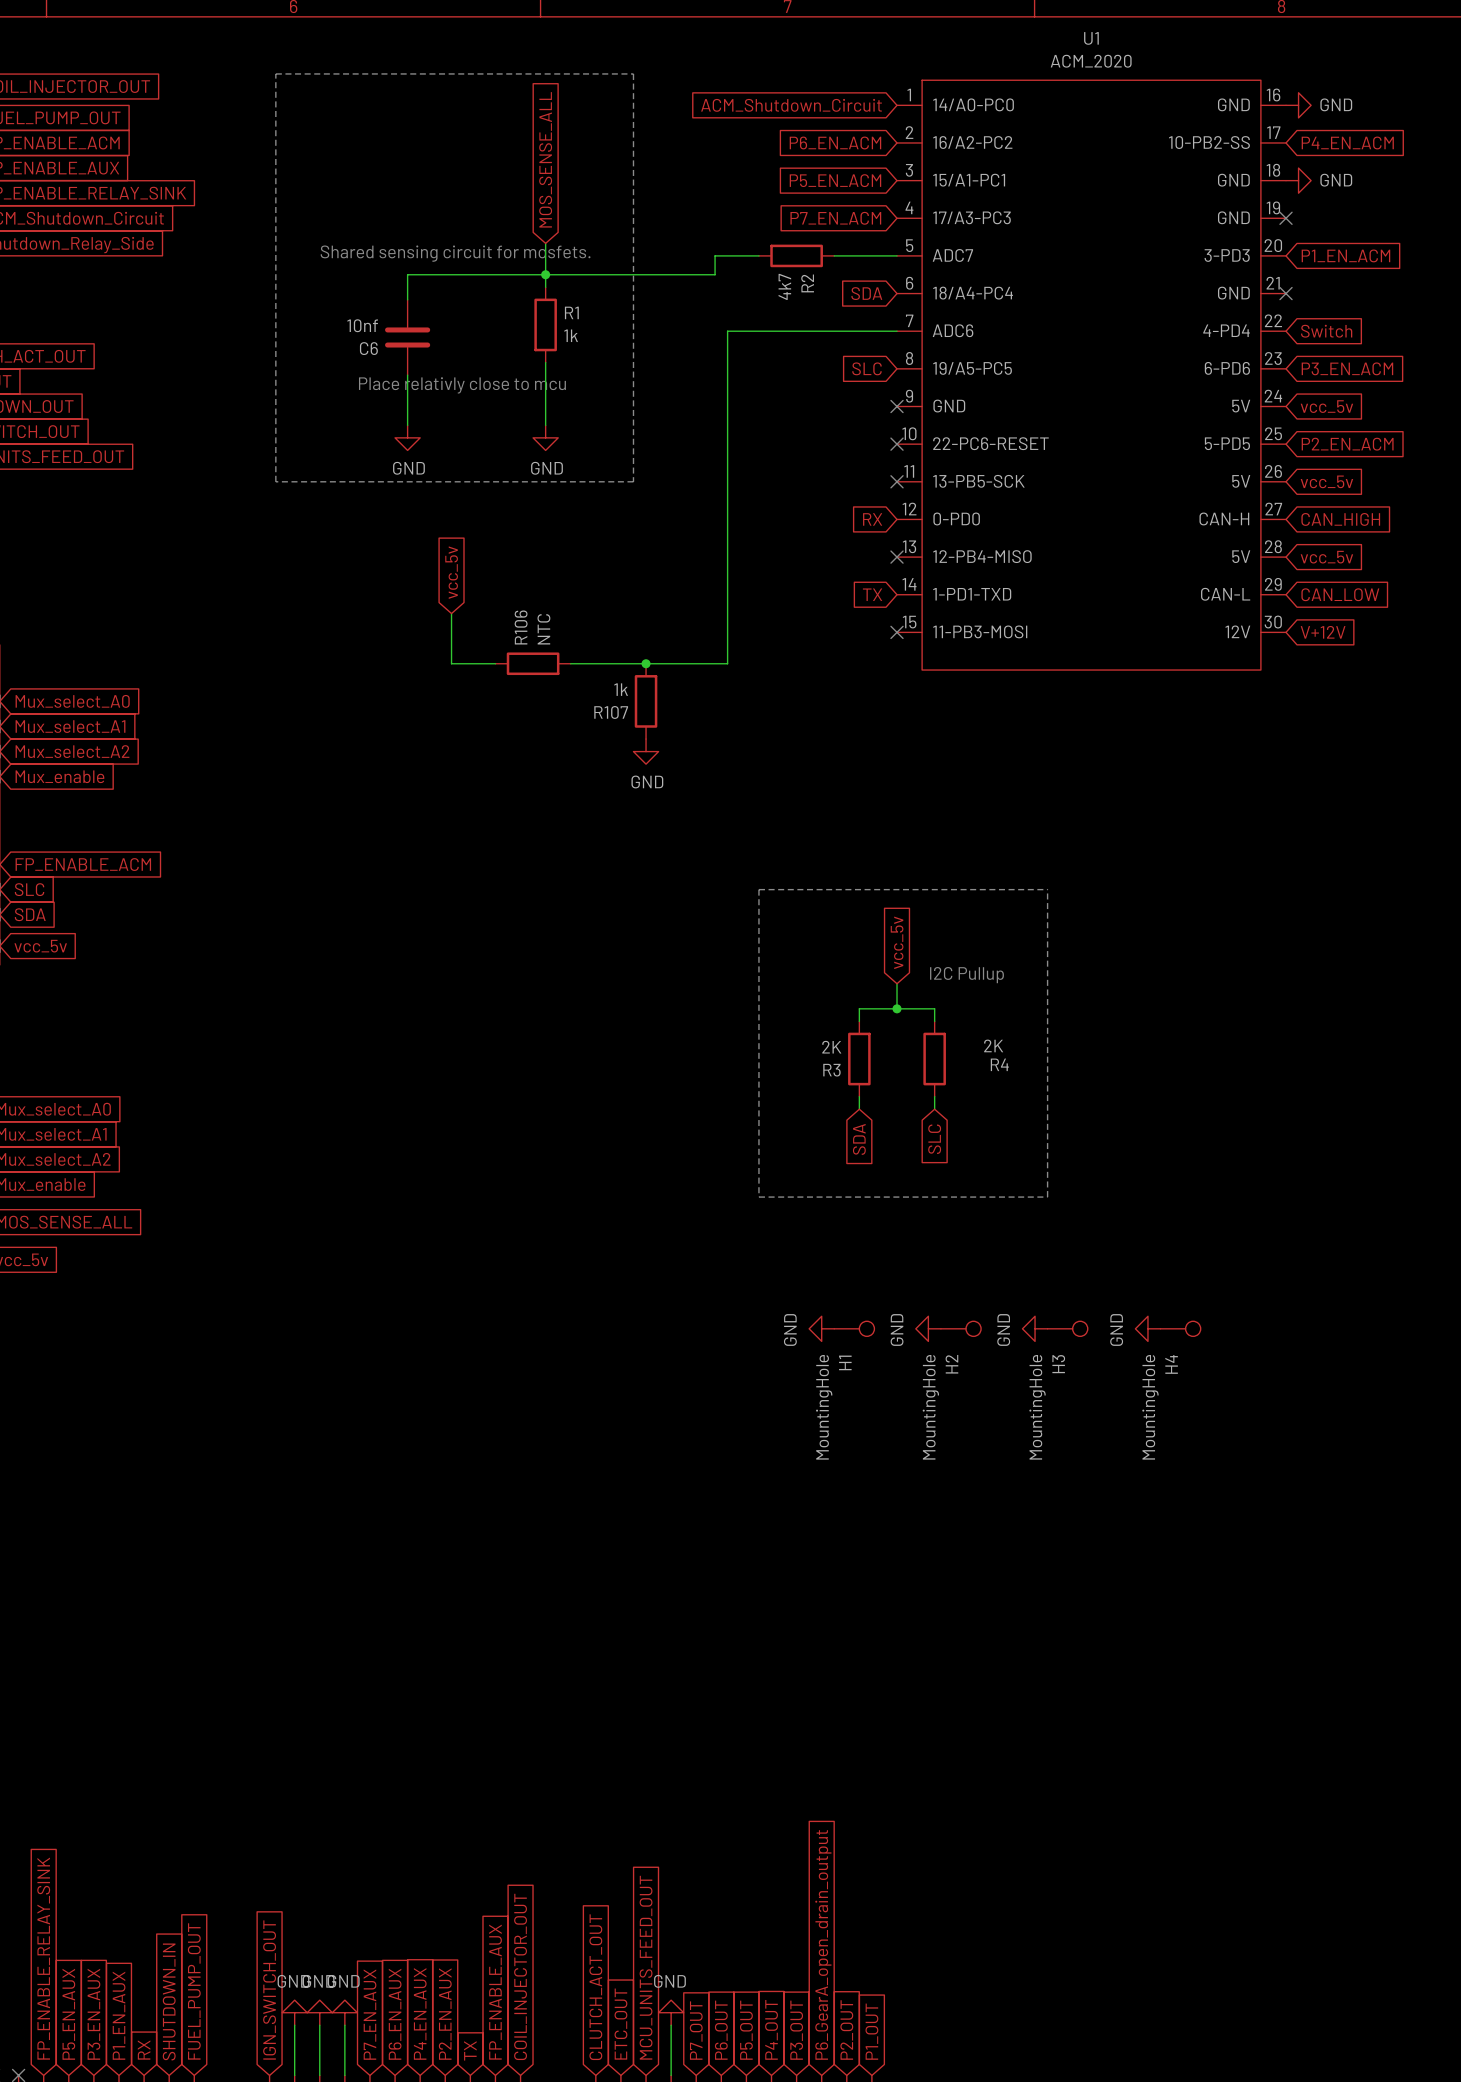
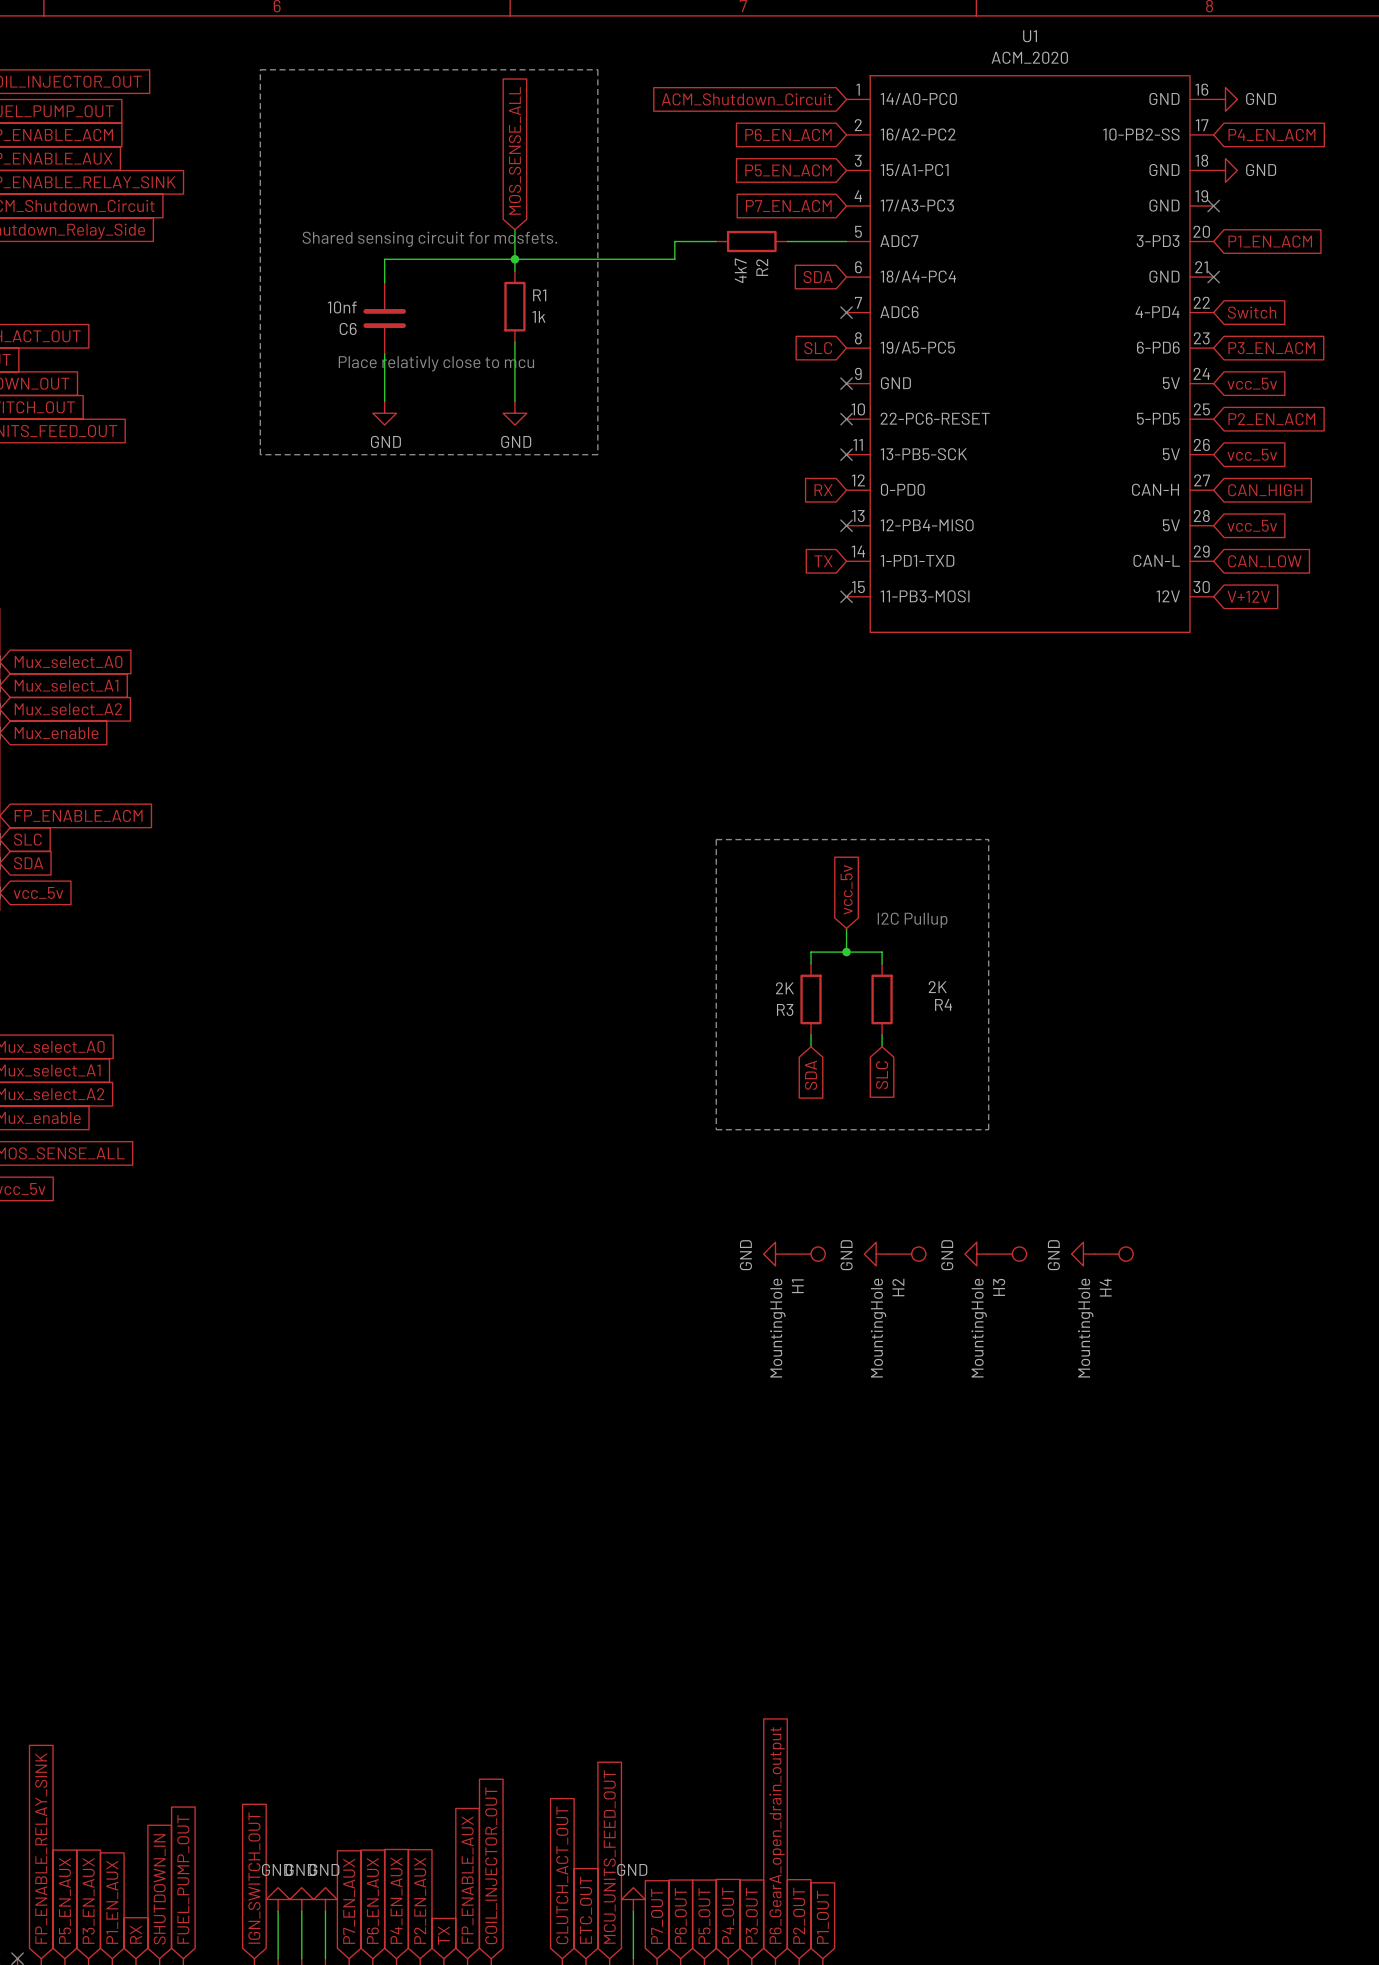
wire: (897, 331) (727, 331) (727, 663) (570, 663) -> none
no-connect mark: none -> (846, 312)
global label: vcc_5v (451, 572) -> none
wire: (451, 613) (451, 663) (495, 663) -> none
R106: NTC (533, 663) -> none
junction: (646, 663) -> none
R107: 1k (646, 701) -> none
power symbol: GND (646, 751) -> none

